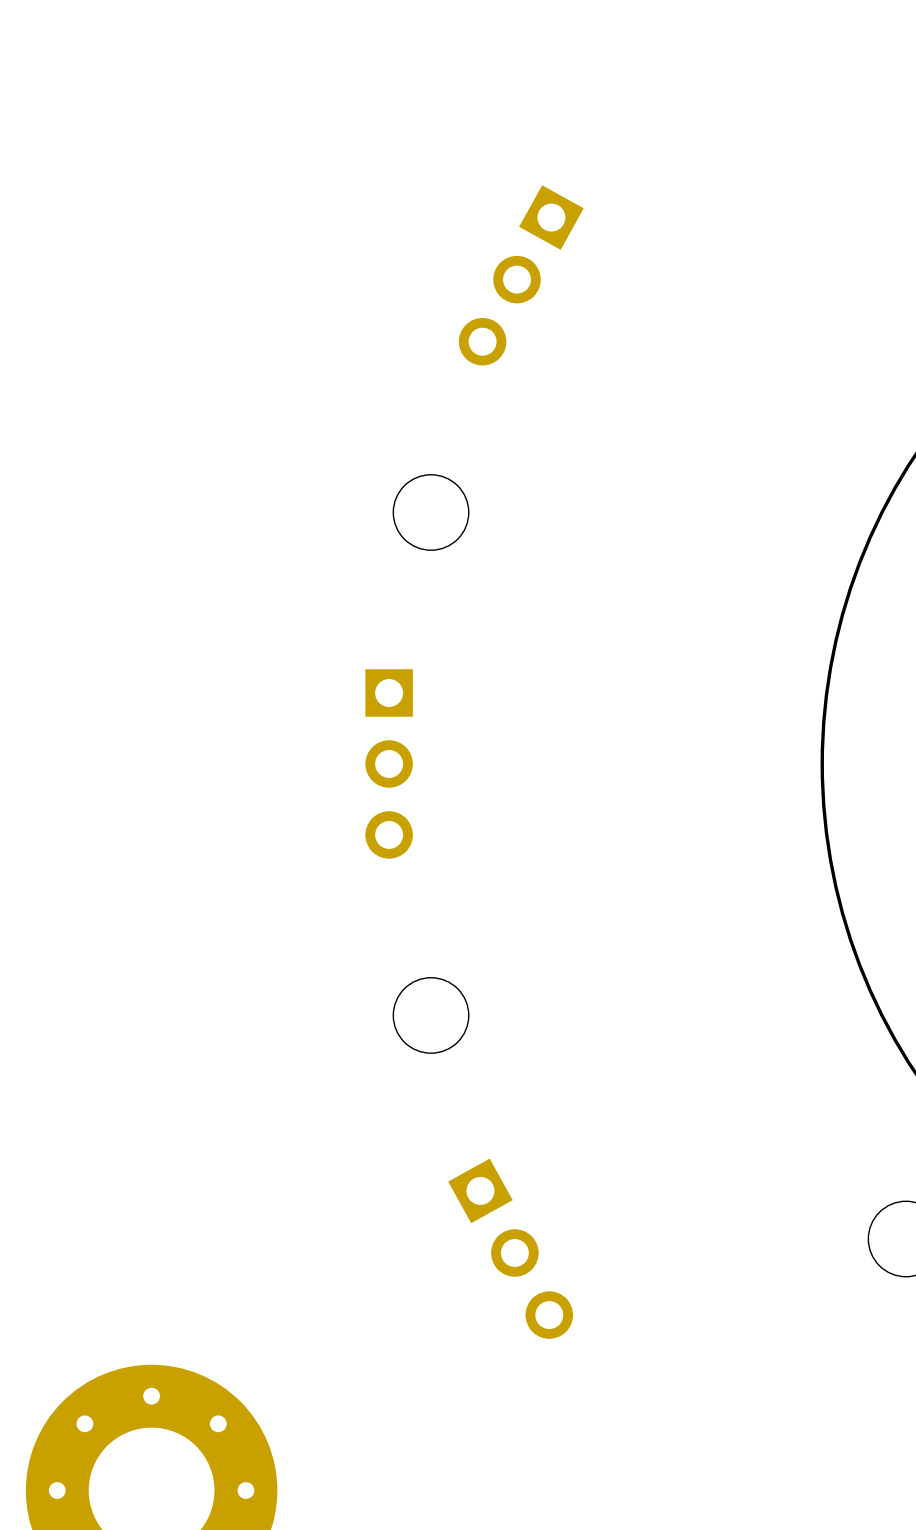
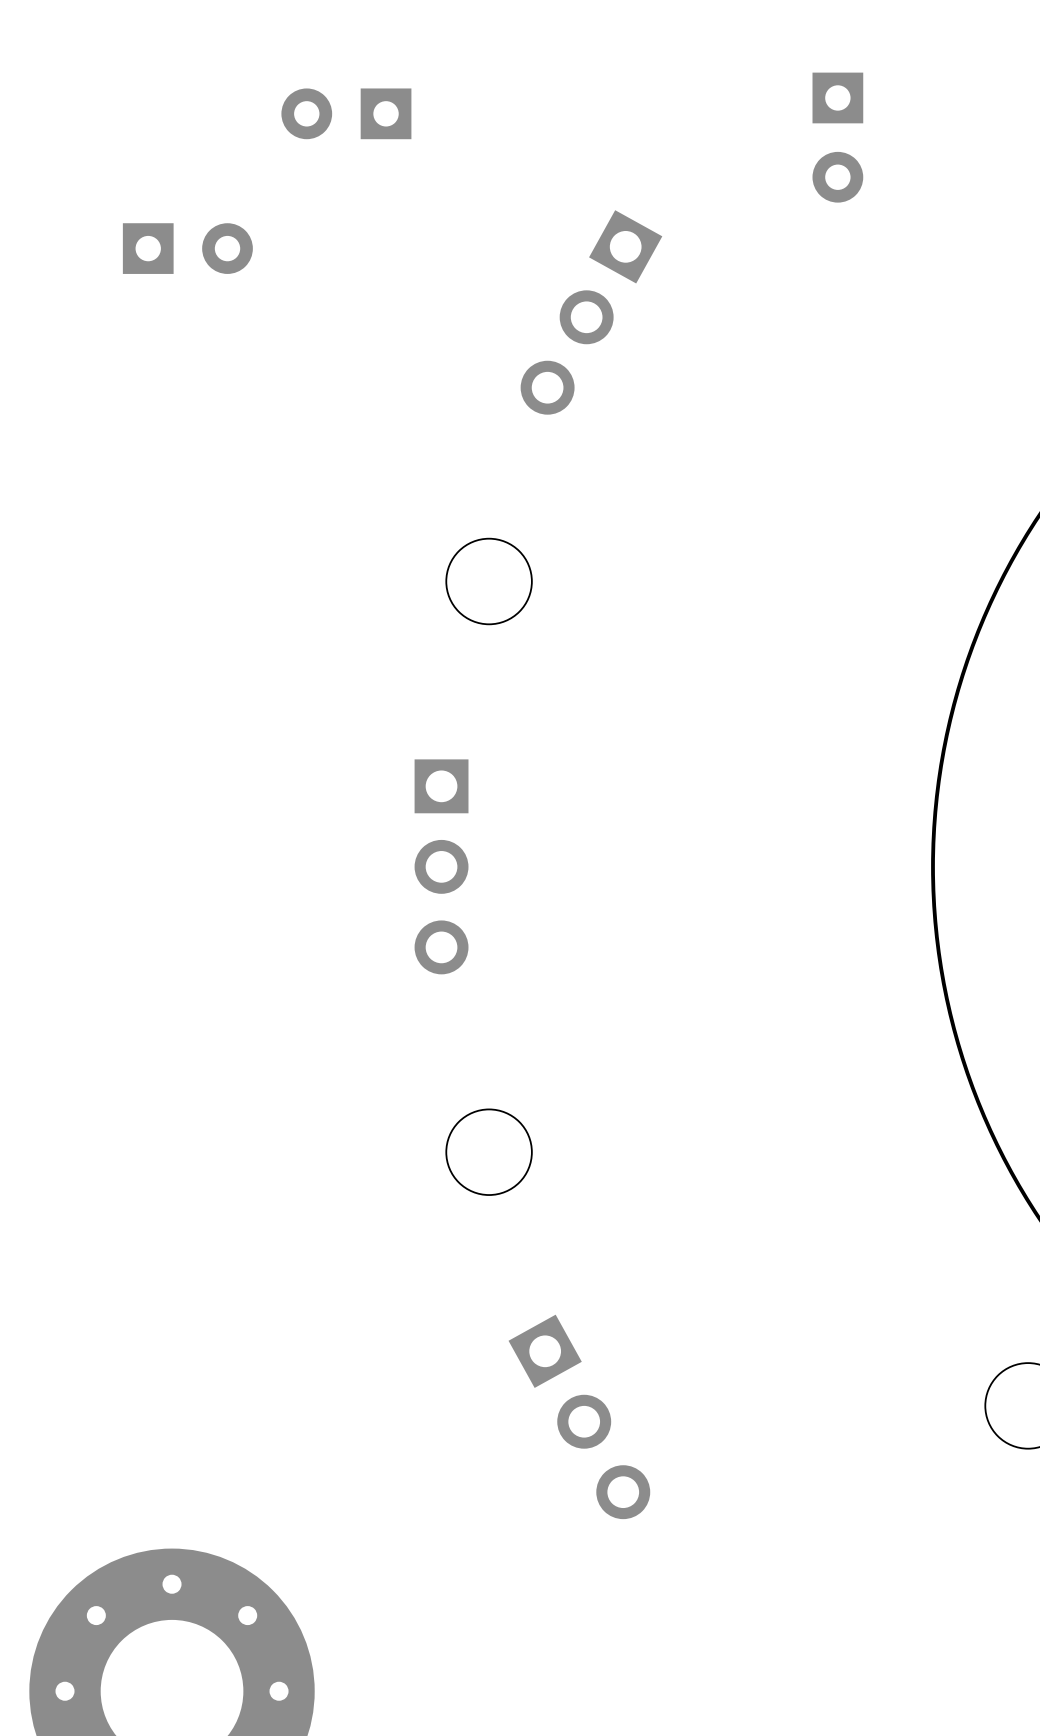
part: none -> (346, 113)
part: none -> (837, 137)
part: none -> (187, 248)

